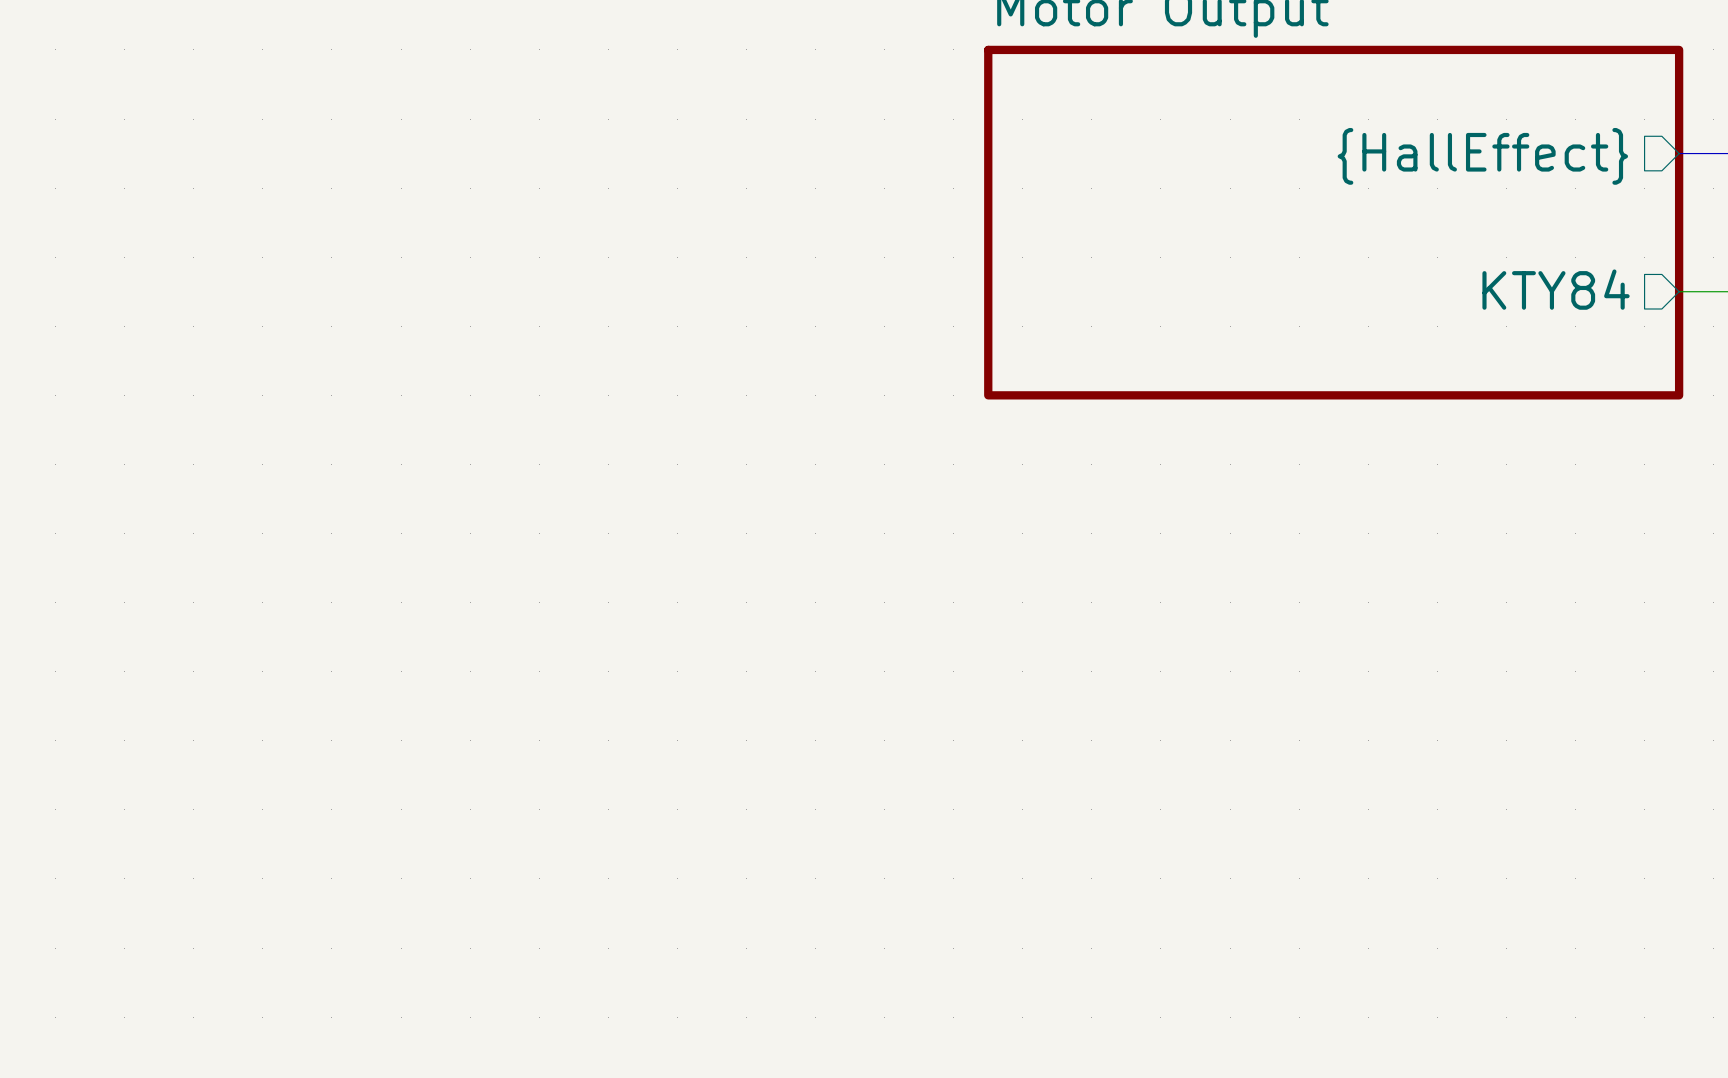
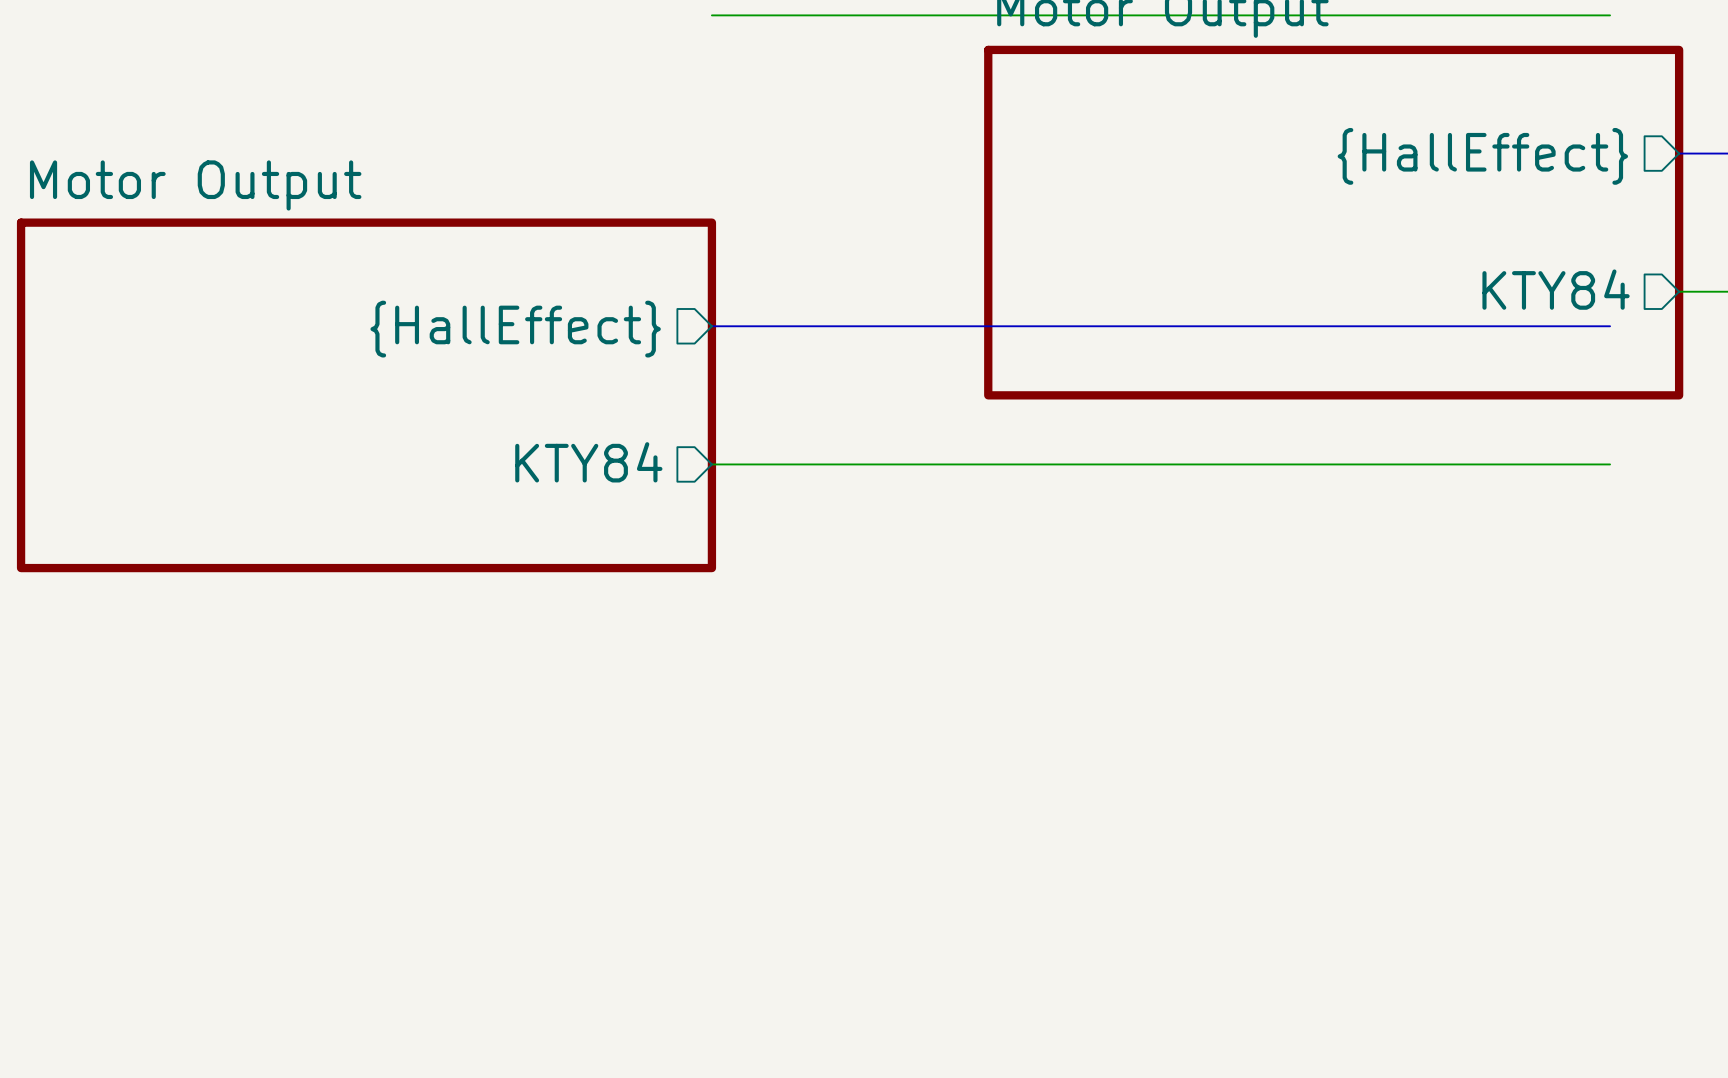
wire: none -> (711, 15) (1610, 15)
bus: none -> (711, 326) (1610, 326)
sheet pin: none -> {HallEffect} (515, 329)
sheet Motor Output: none -> (366, 395)
sheet pin: none -> KTY84 (588, 462)
wire: none -> (711, 464) (1610, 464)

